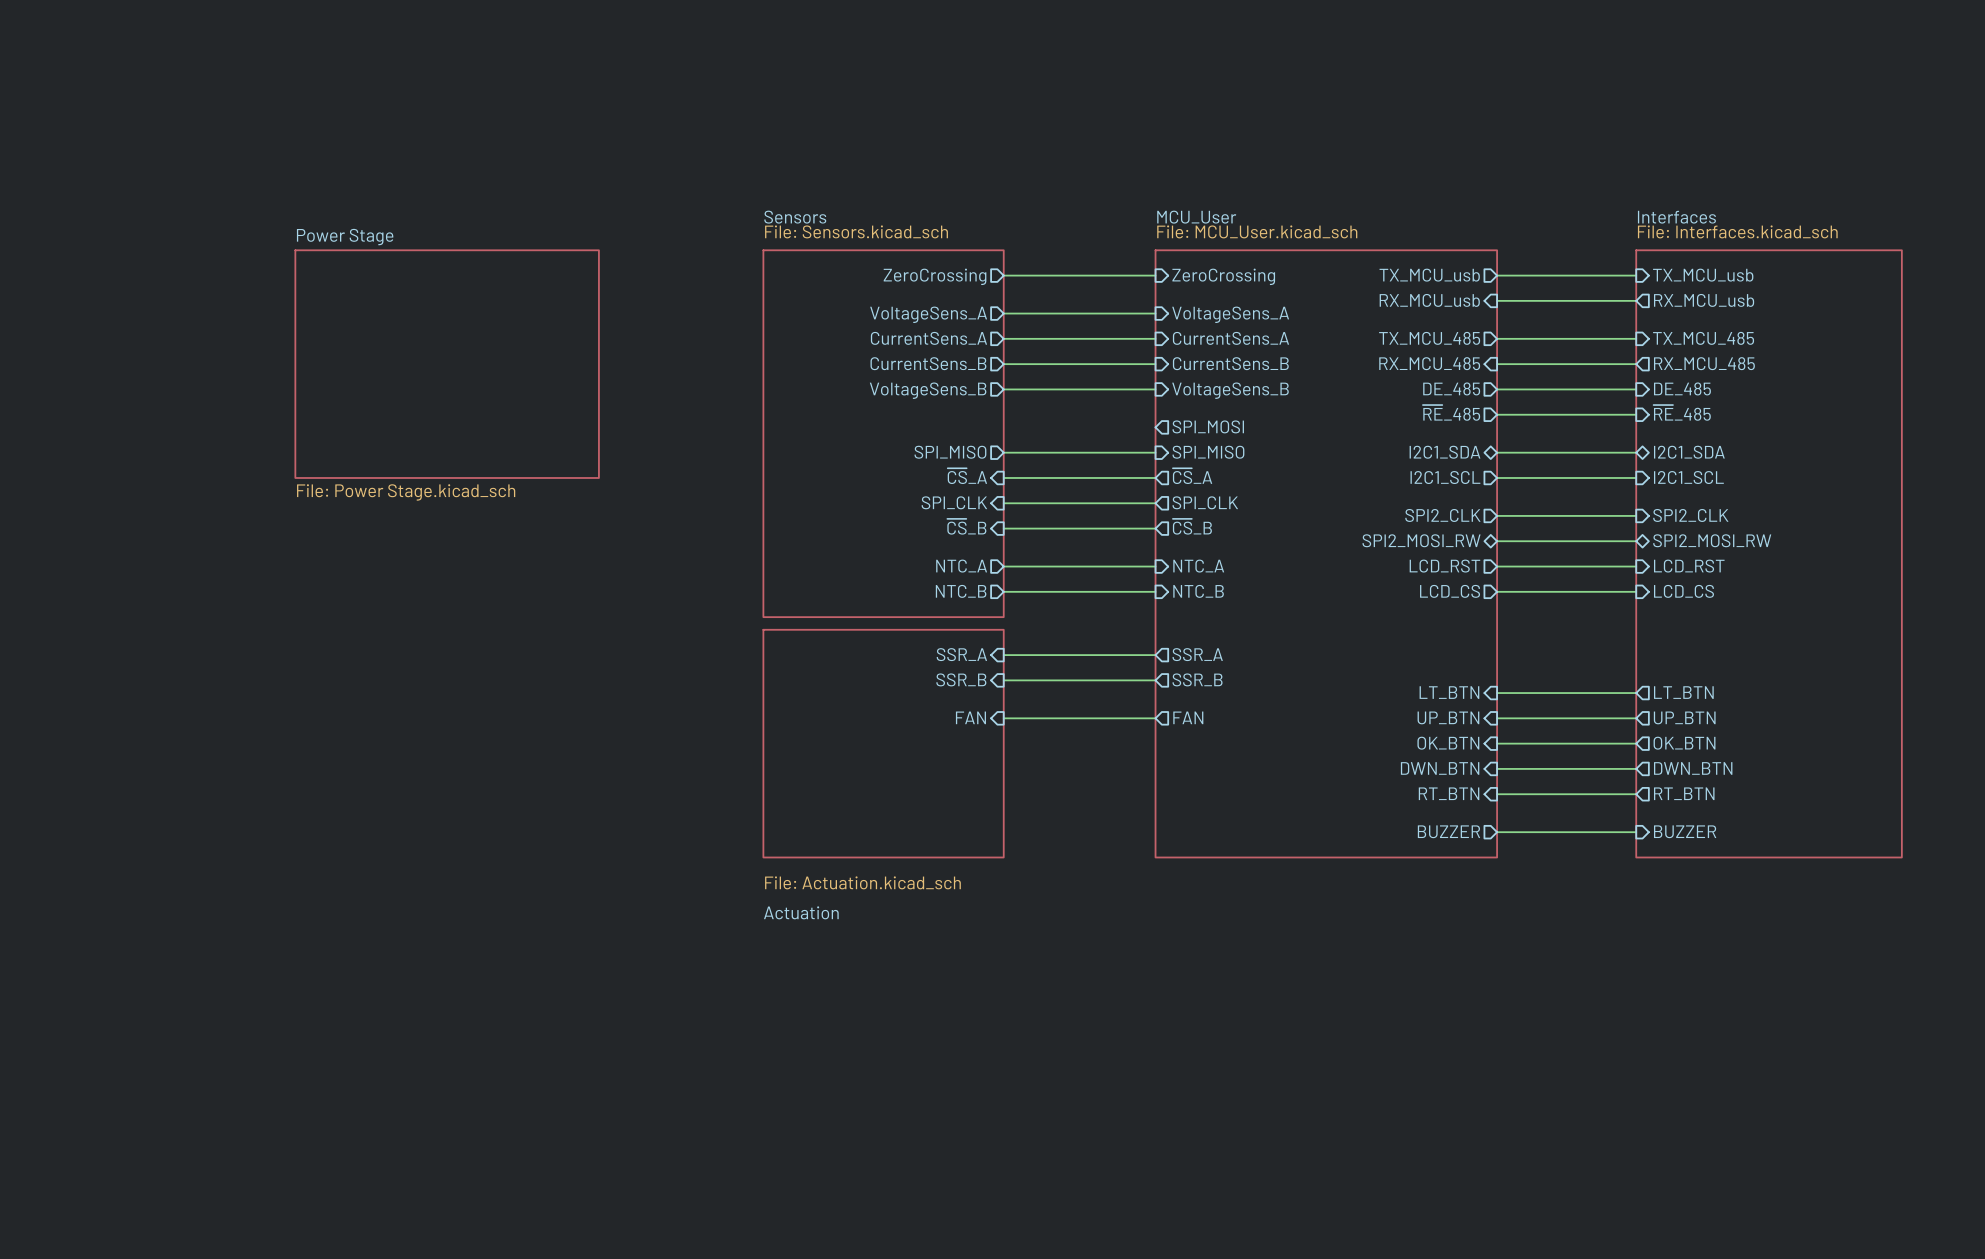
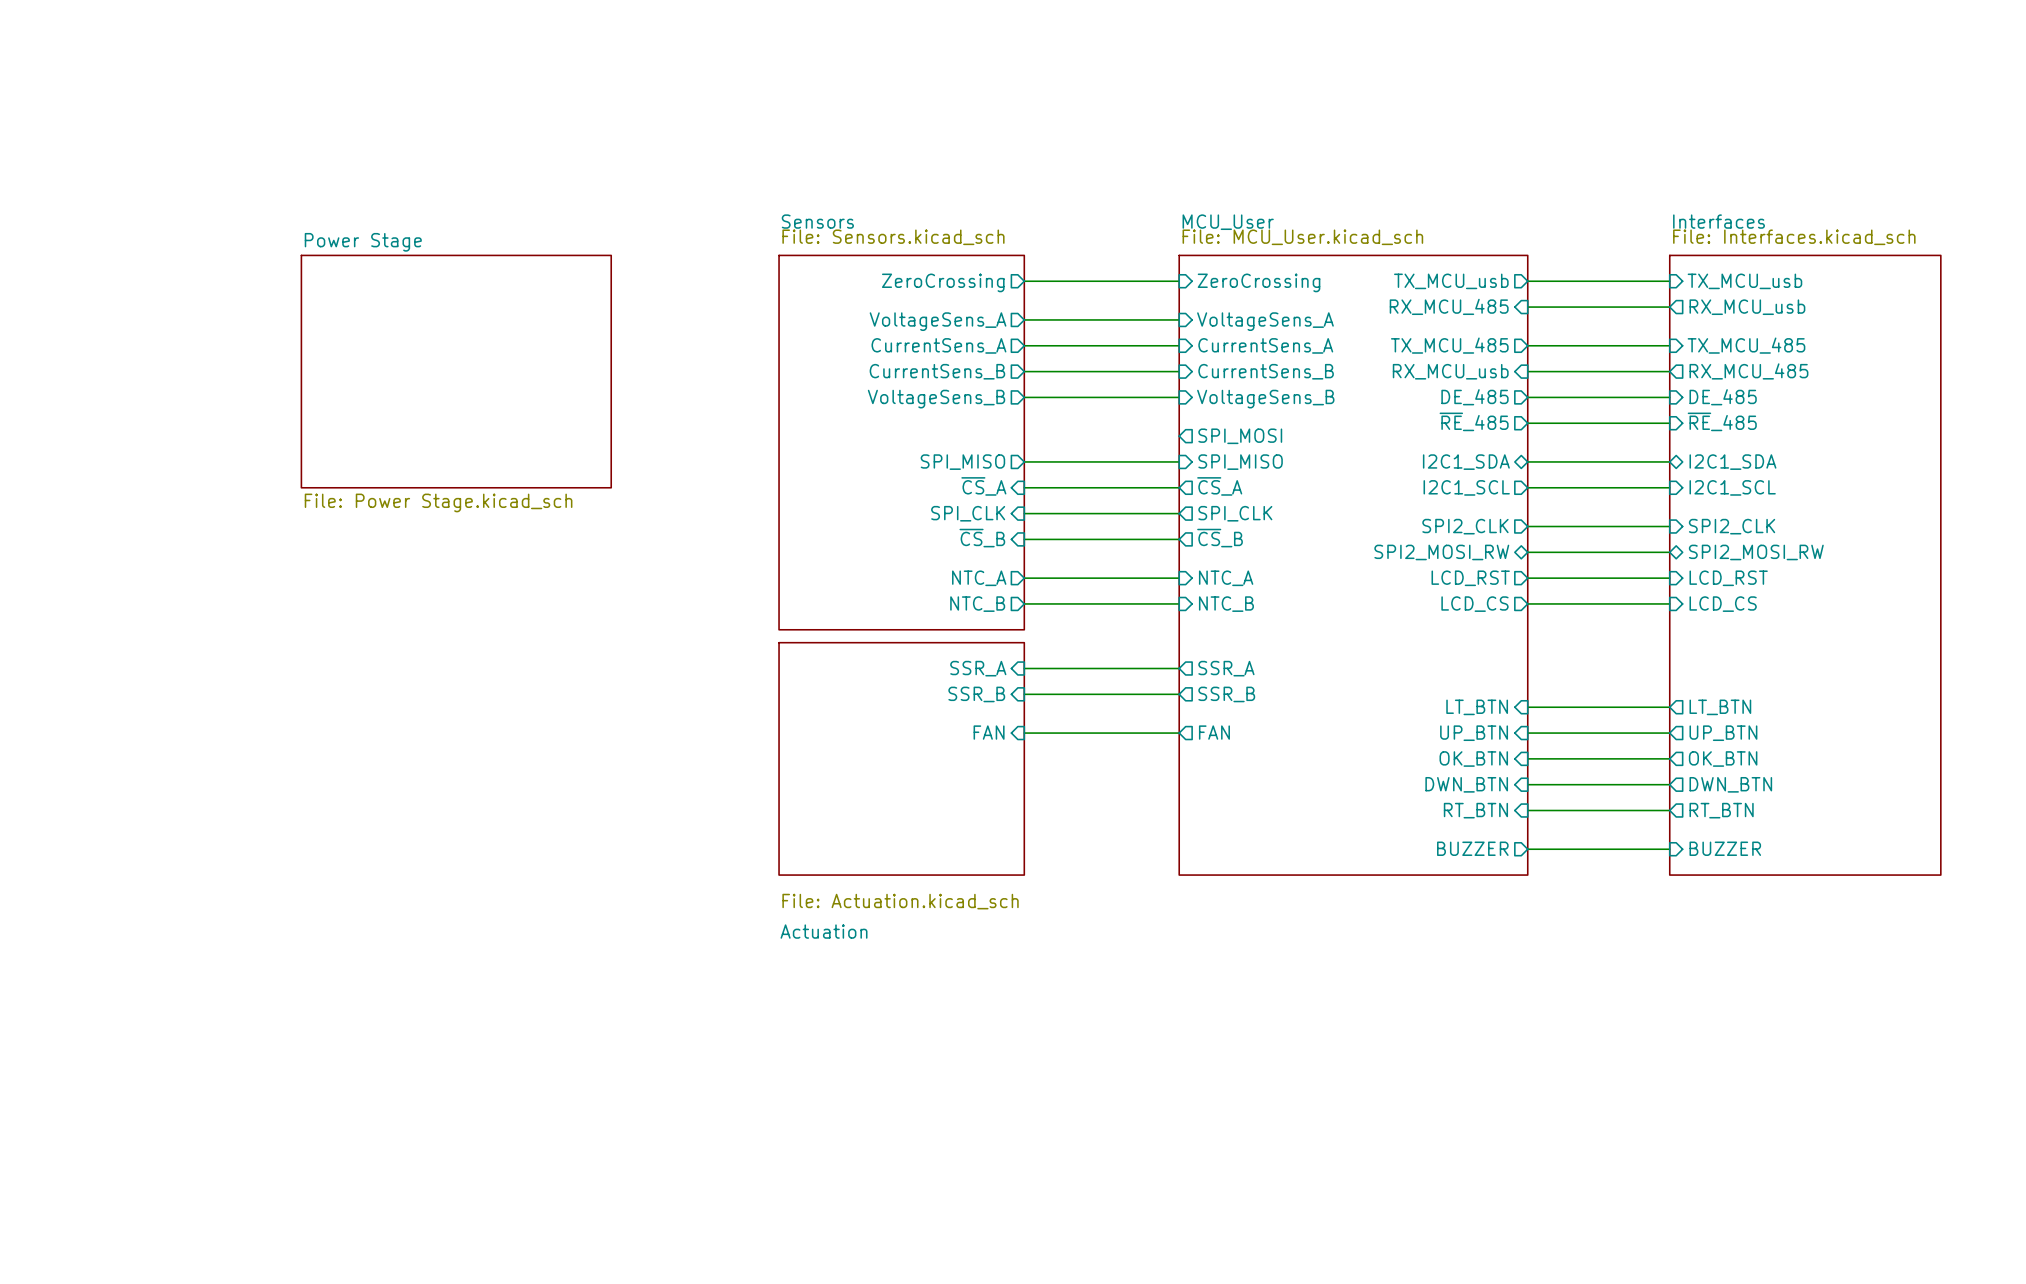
sheet pin: RX_MCU_usb (1429, 300) -> RX_MCU_485 (1449, 306)
sheet pin: RX_MCU_485 (1429, 363) -> RX_MCU_usb (1450, 371)

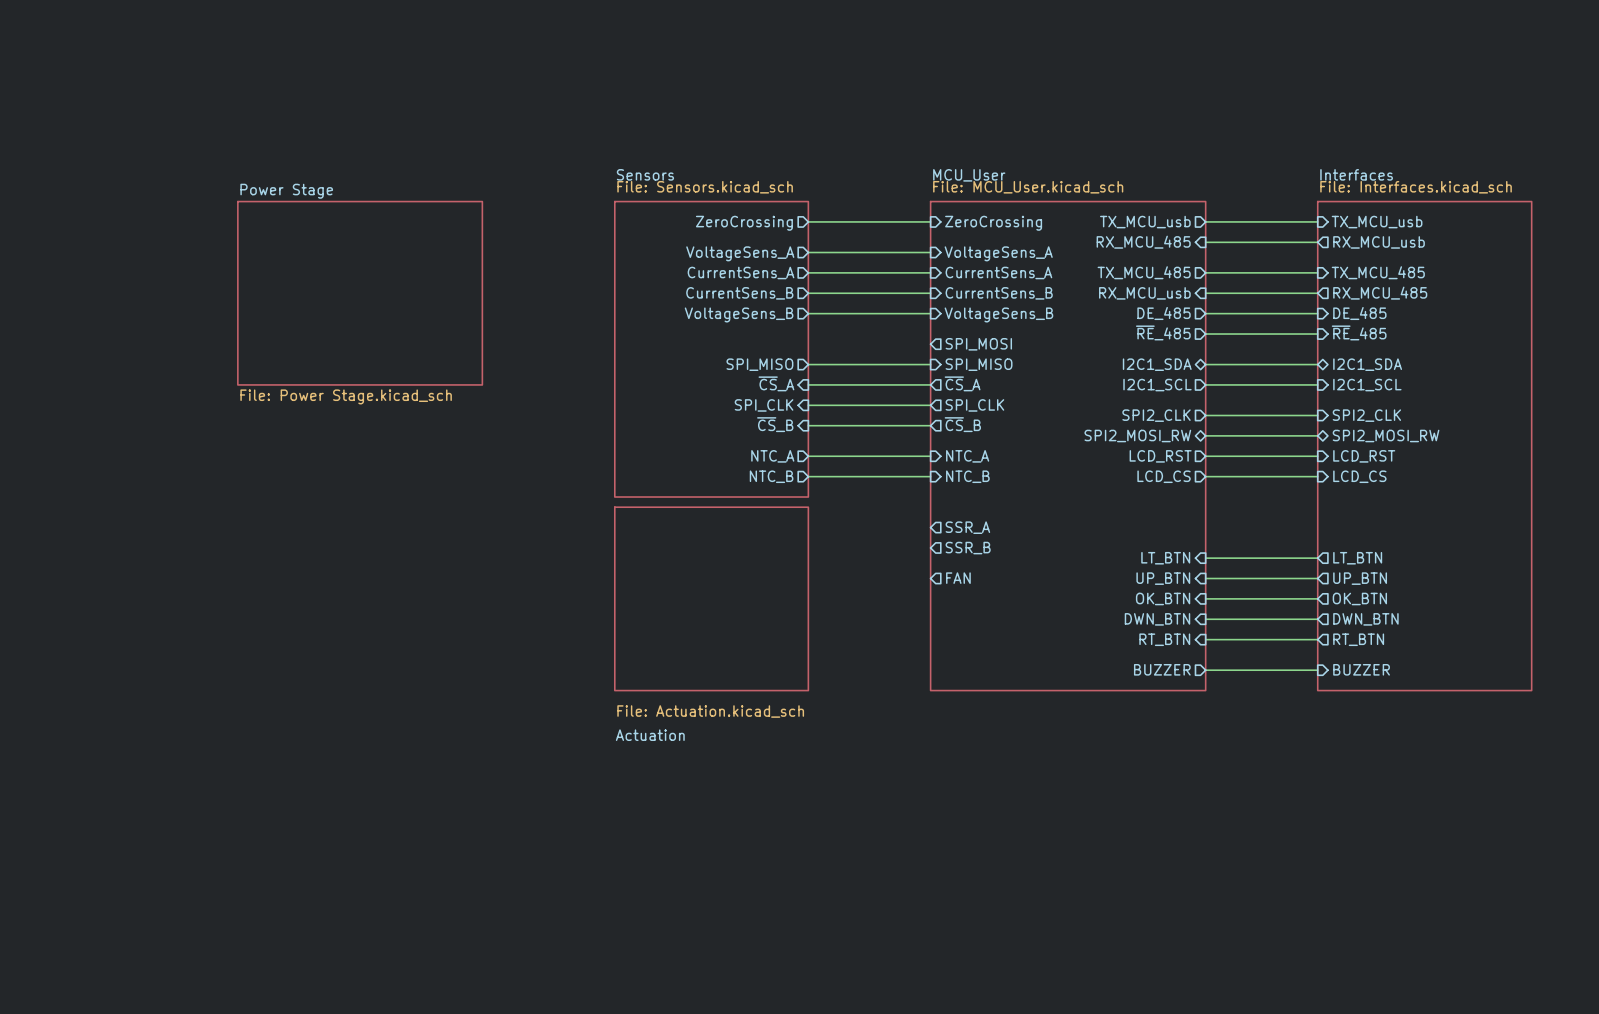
sheet pin: SSR_A (978, 668) -> none
wire: (1024, 668) (1179, 668) -> none
sheet pin: SSR_B (976, 694) -> none
wire: (1024, 694) (1179, 694) -> none
sheet pin: FAN (989, 732) -> none
wire: (1024, 733) (1179, 733) -> none

